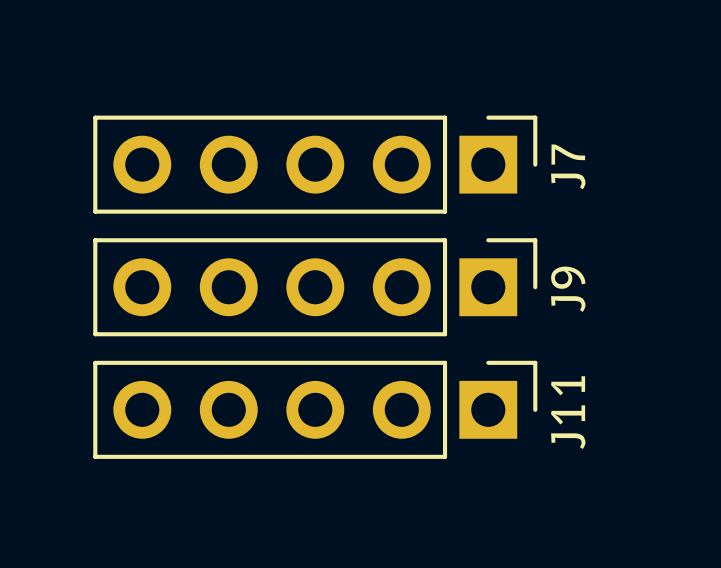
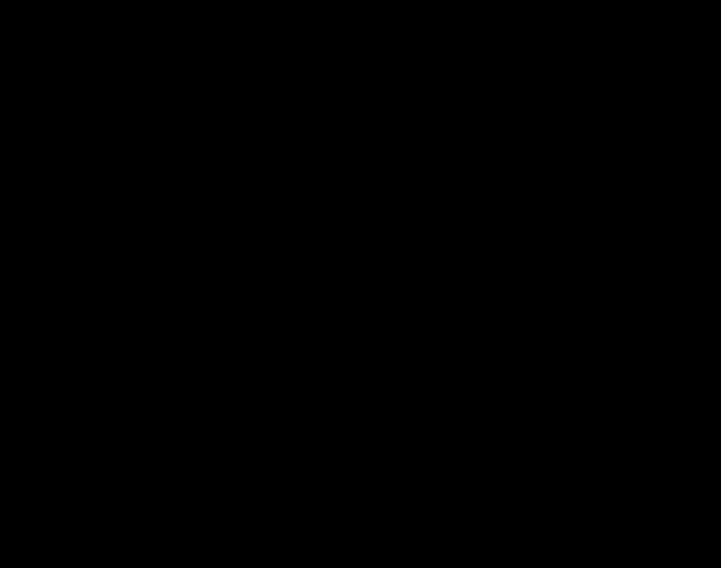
J7: (315, 164) -> none
J9: (315, 287) -> none
J11: (315, 409) -> none

